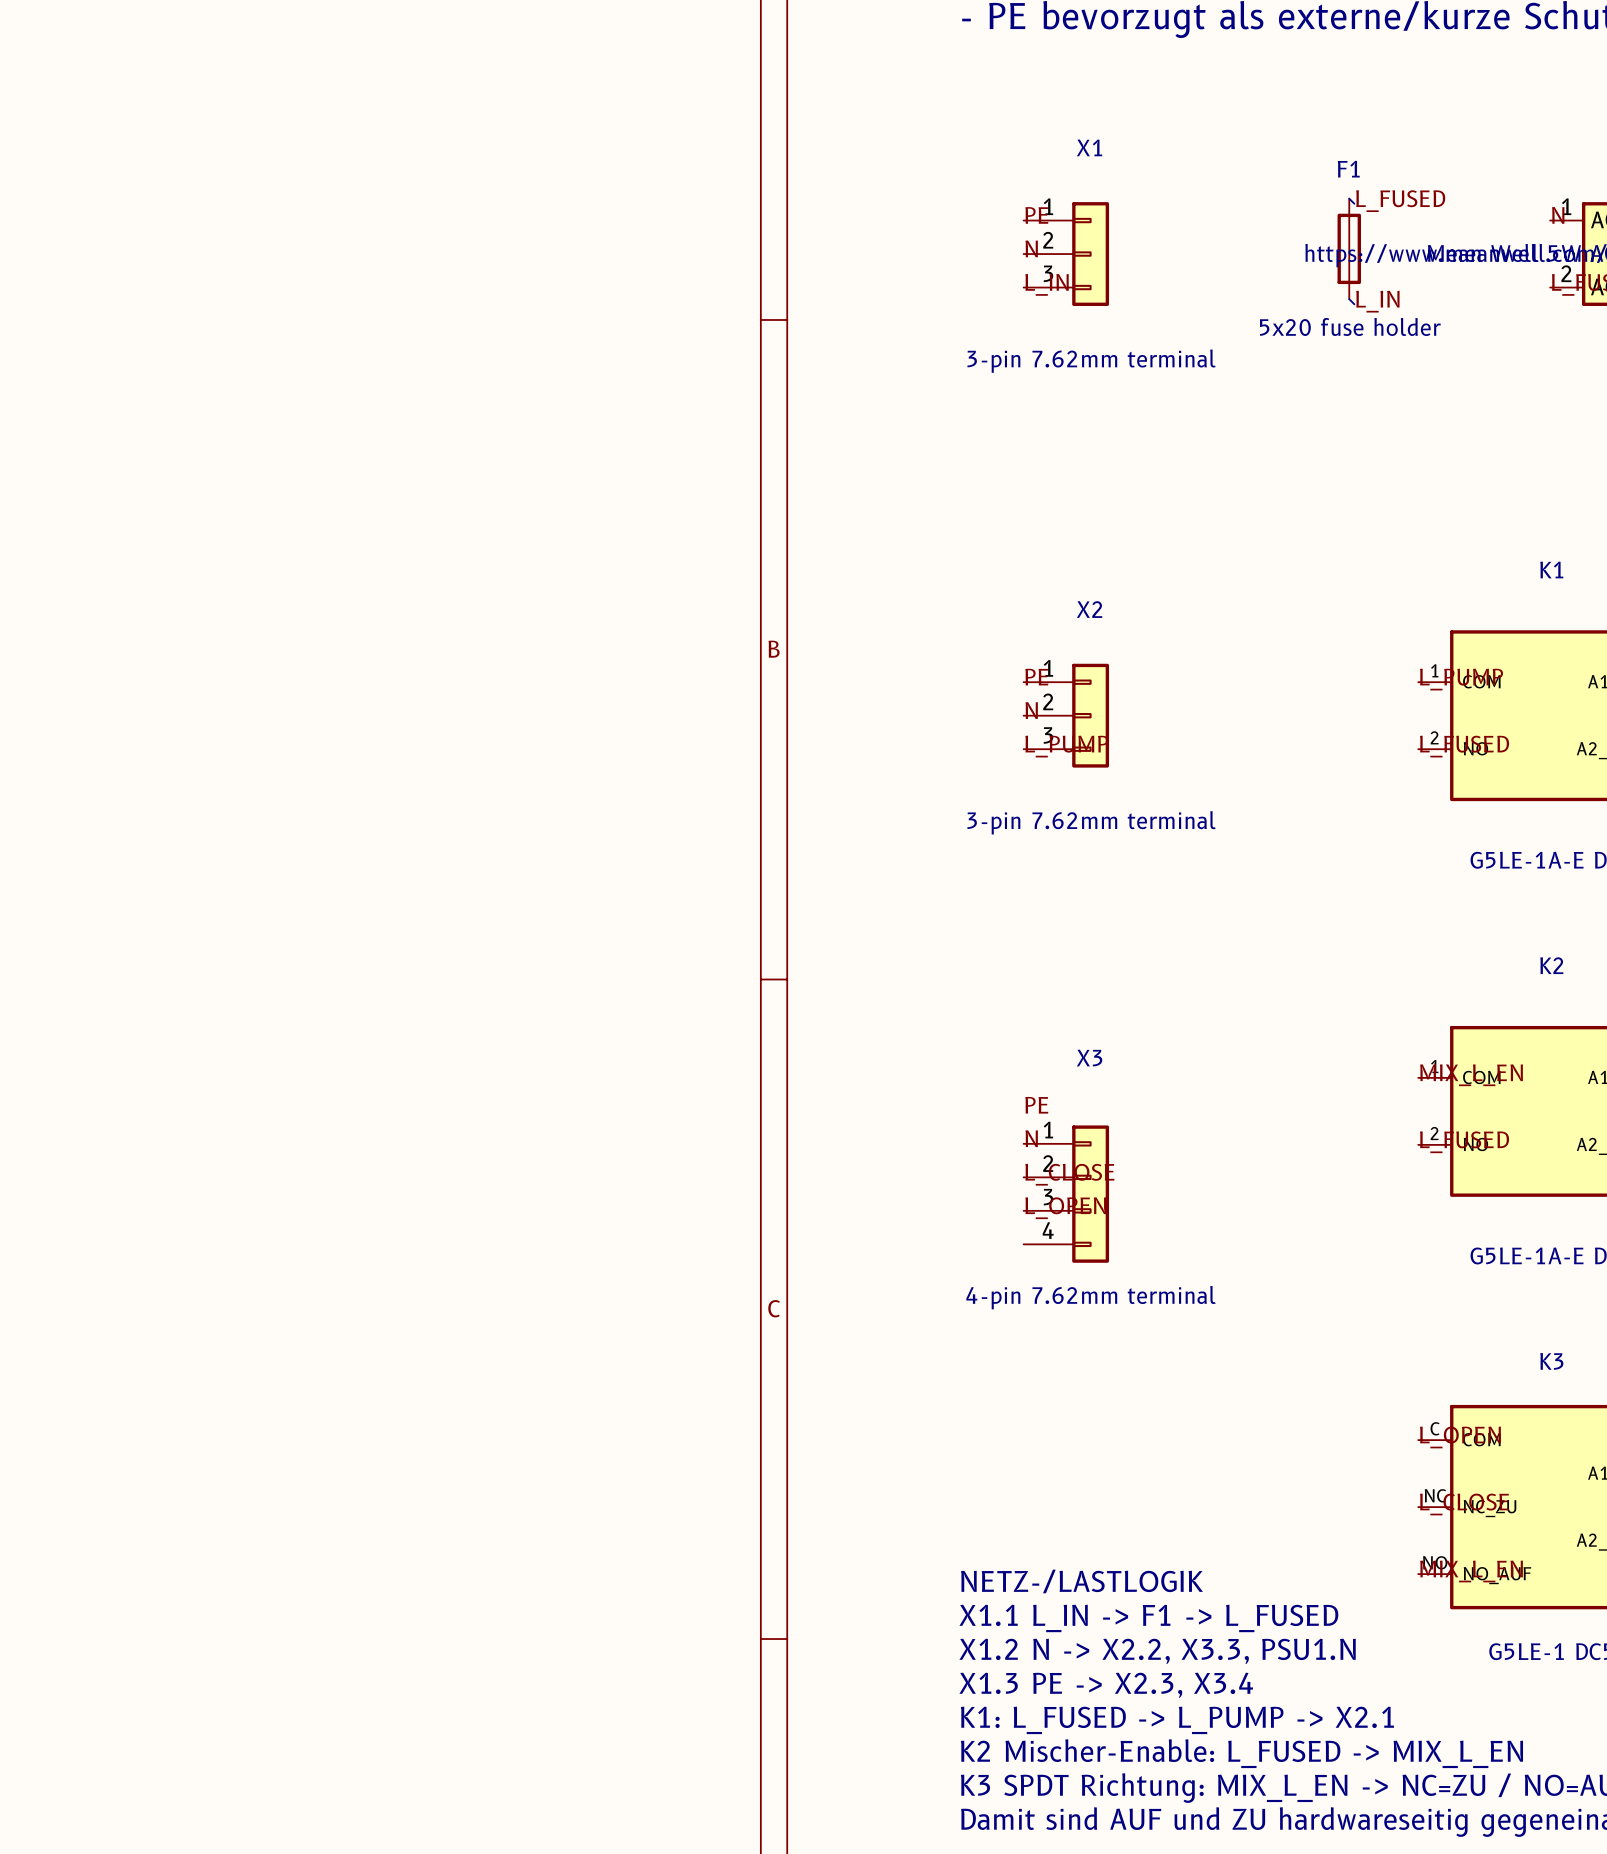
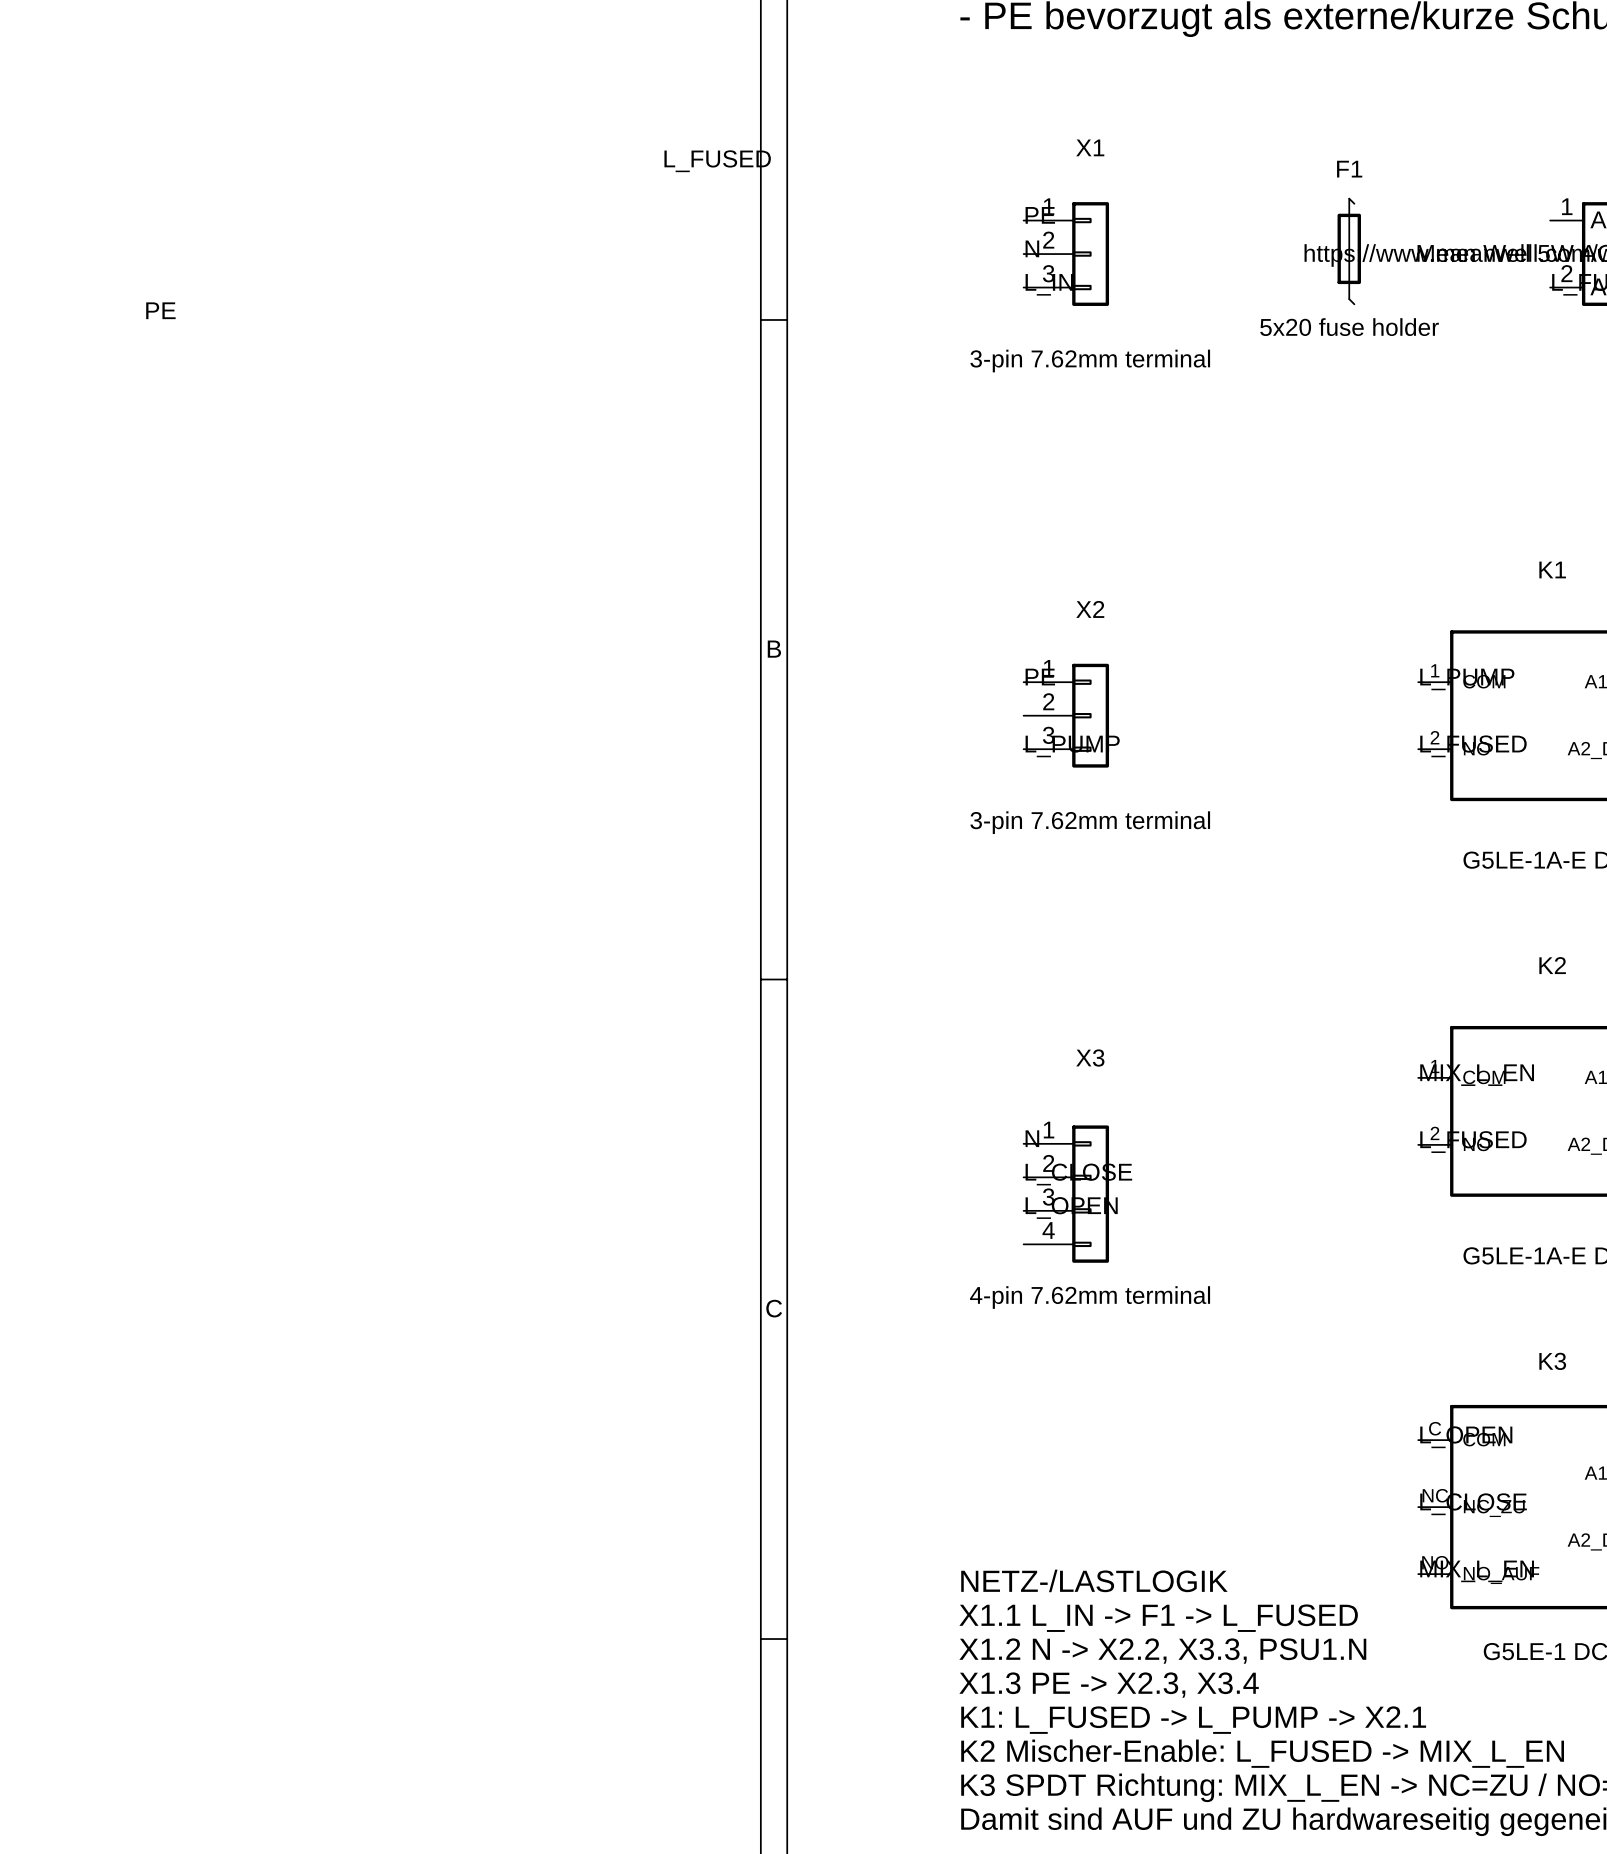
label: none -> L_FUSED (717, 161)
label: L_FUSED (1400, 201) -> none
label: N (1558, 215) -> none
label: L_IN (1377, 301) -> none
label: none -> PE (160, 310)
label: N (1031, 710) -> none
label: PE (1036, 1105) -> none

